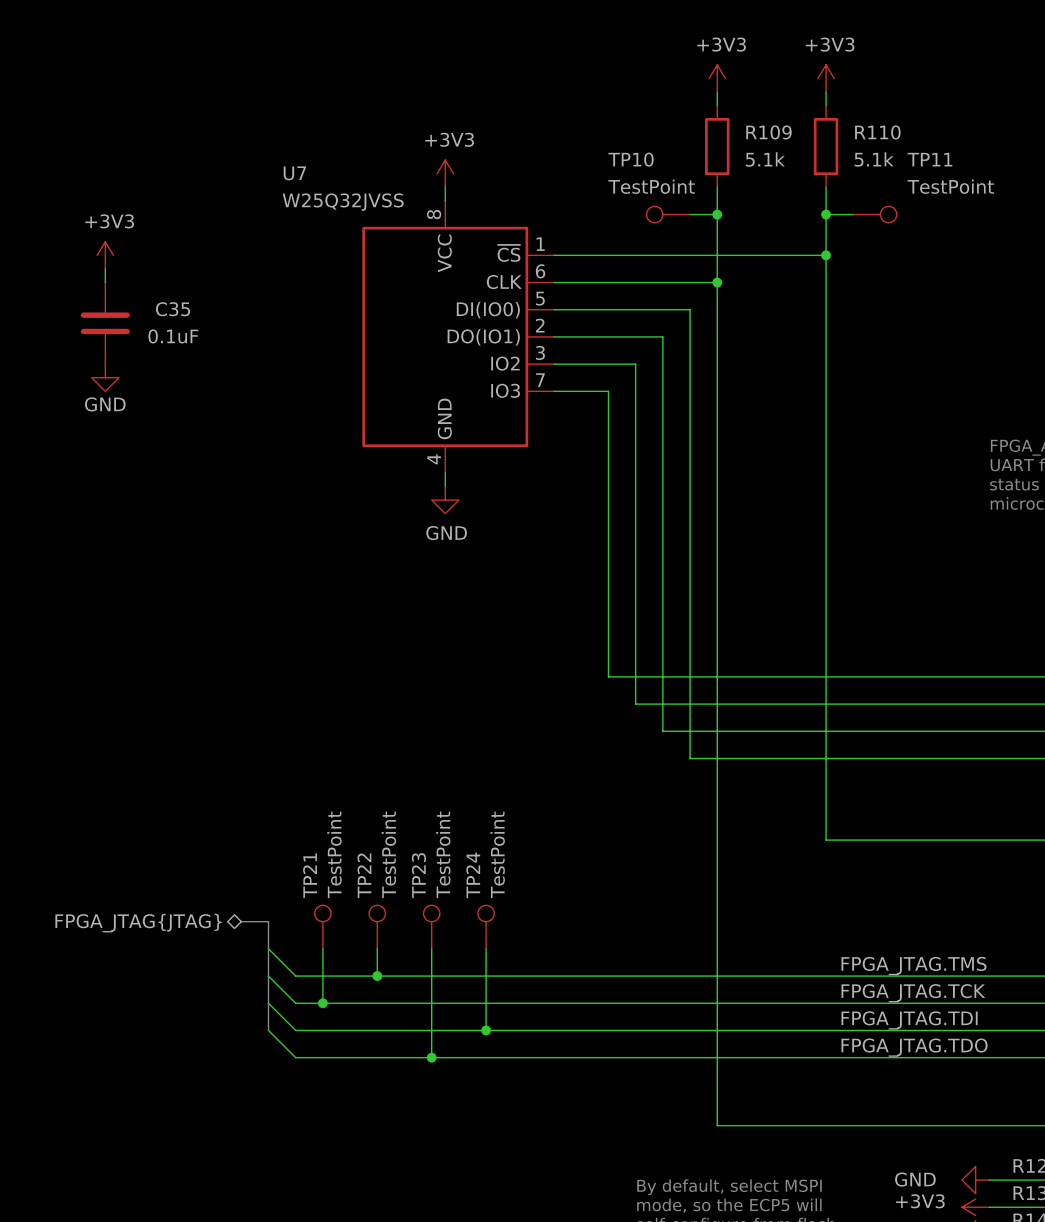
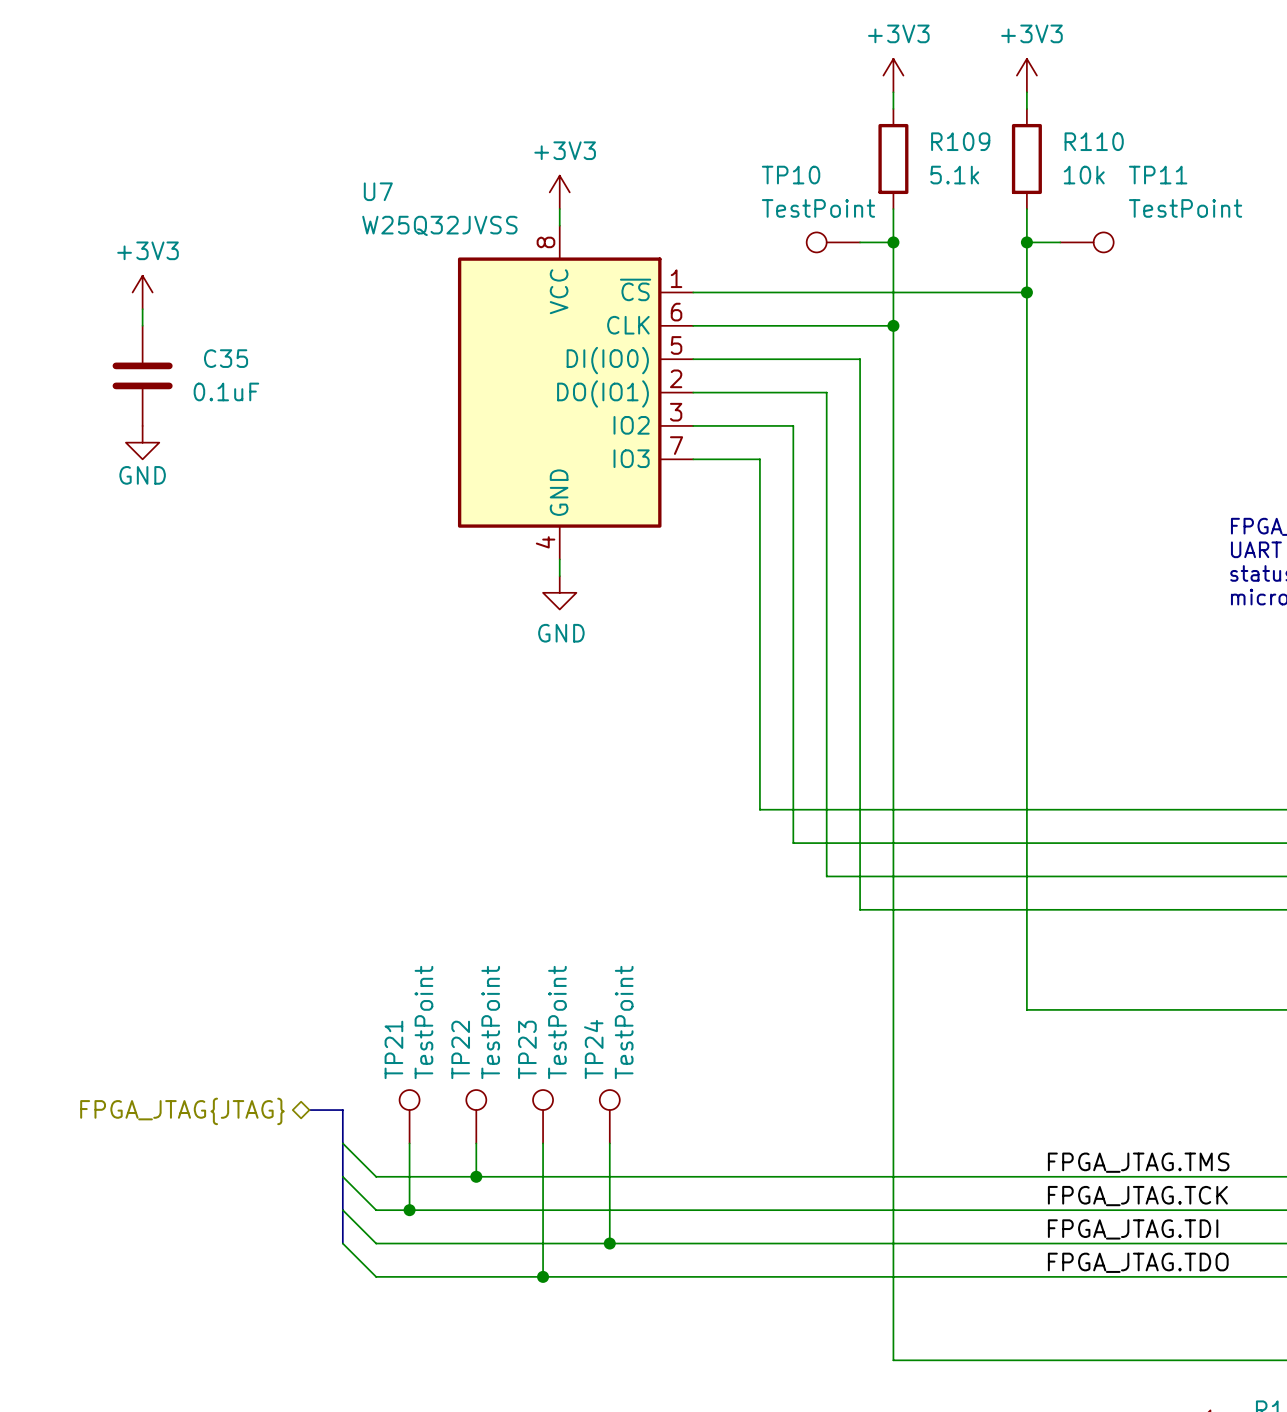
R110 value: 5.1k (874, 159) -> 10k (1084, 175)

